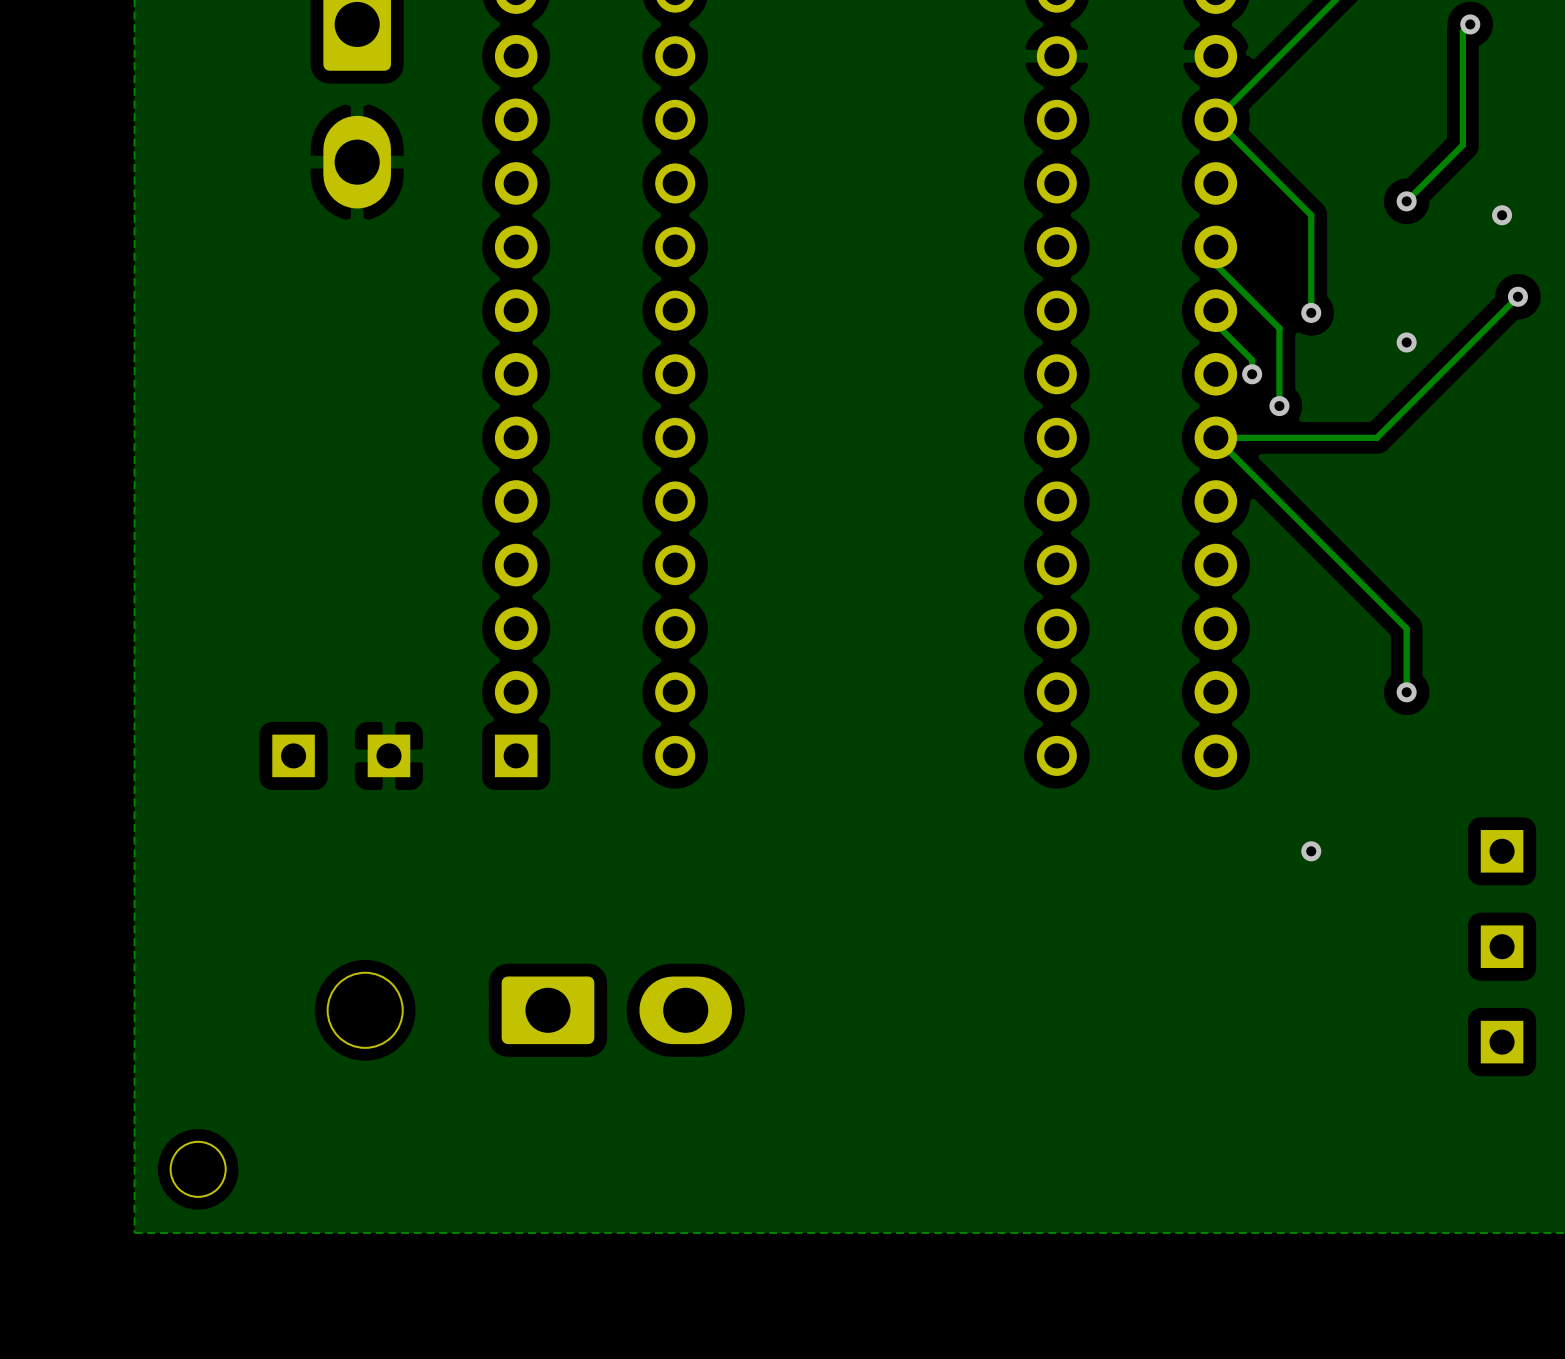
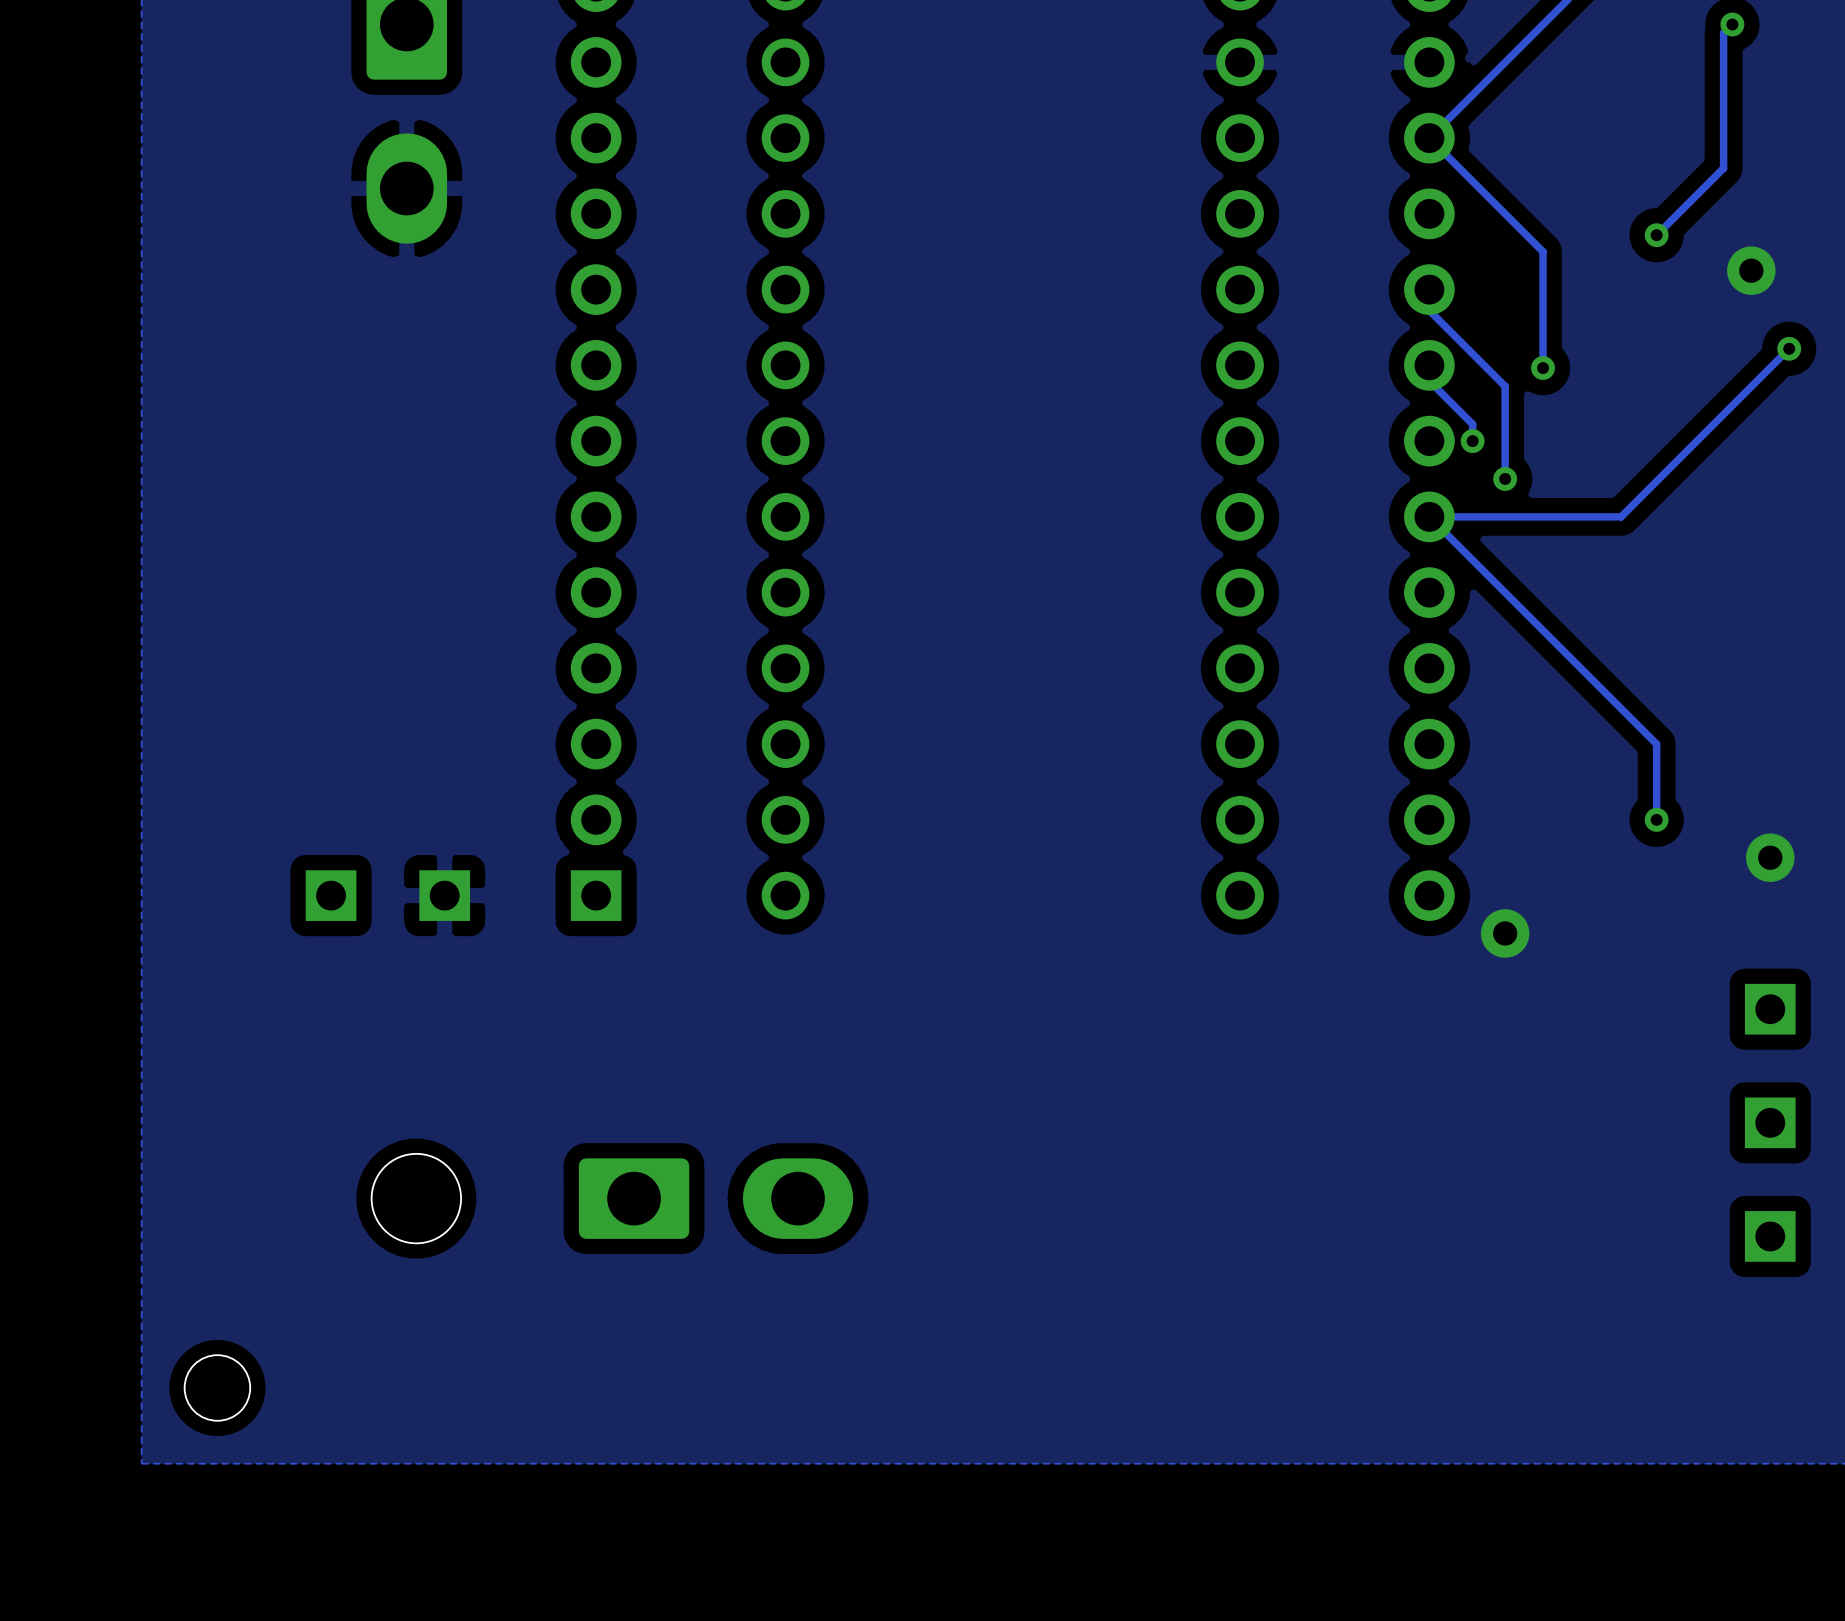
via size: [1492, 205, 1513, 226] -> [1727, 246, 1776, 295]
via: (1406, 342) -> none
via: none -> (1770, 857)
via: none -> (1505, 933)
via: (1311, 851) -> none

